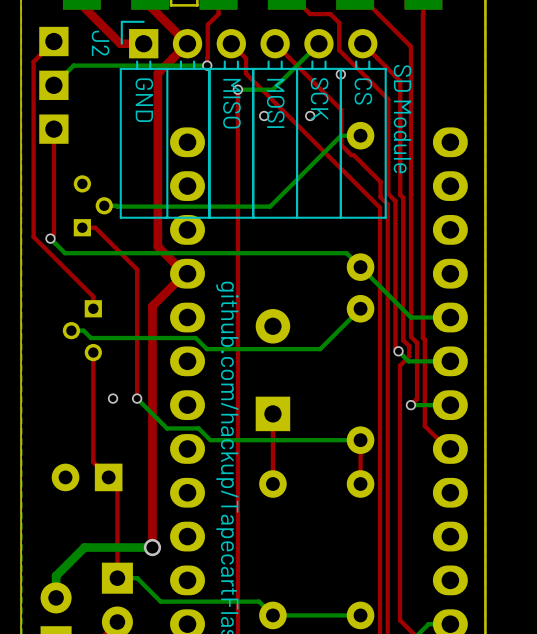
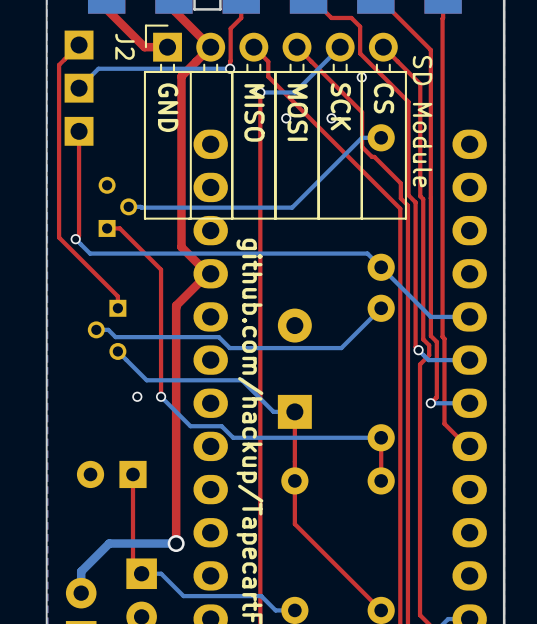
top track: (93, 352) (93, 462) (117, 486) (117, 578) -> (133, 474) (133, 565) (141, 573)
bottom track: none -> (117, 351) (146, 380) (242, 380) (273, 411) (294, 411)
top track: none -> (294, 480) (294, 524) (381, 610)
bottom track: (159, 600) (259, 601) (272, 615) (360, 615) -> (183, 596) (261, 596) (275, 610) (294, 610)

